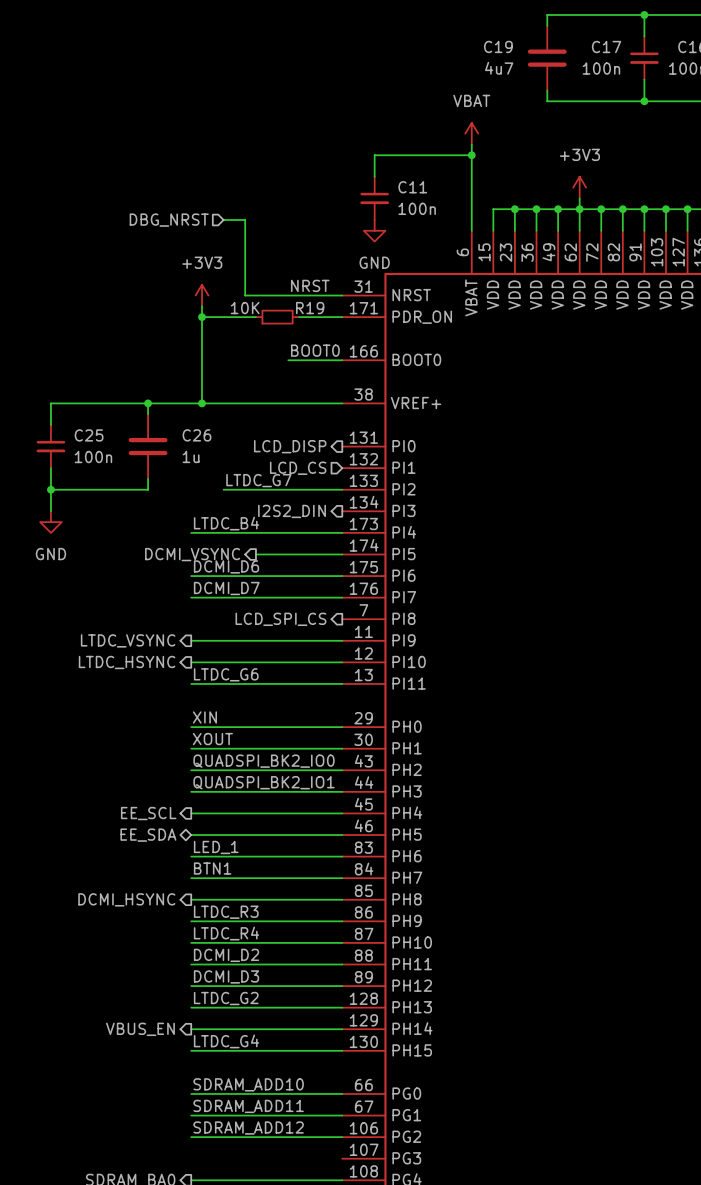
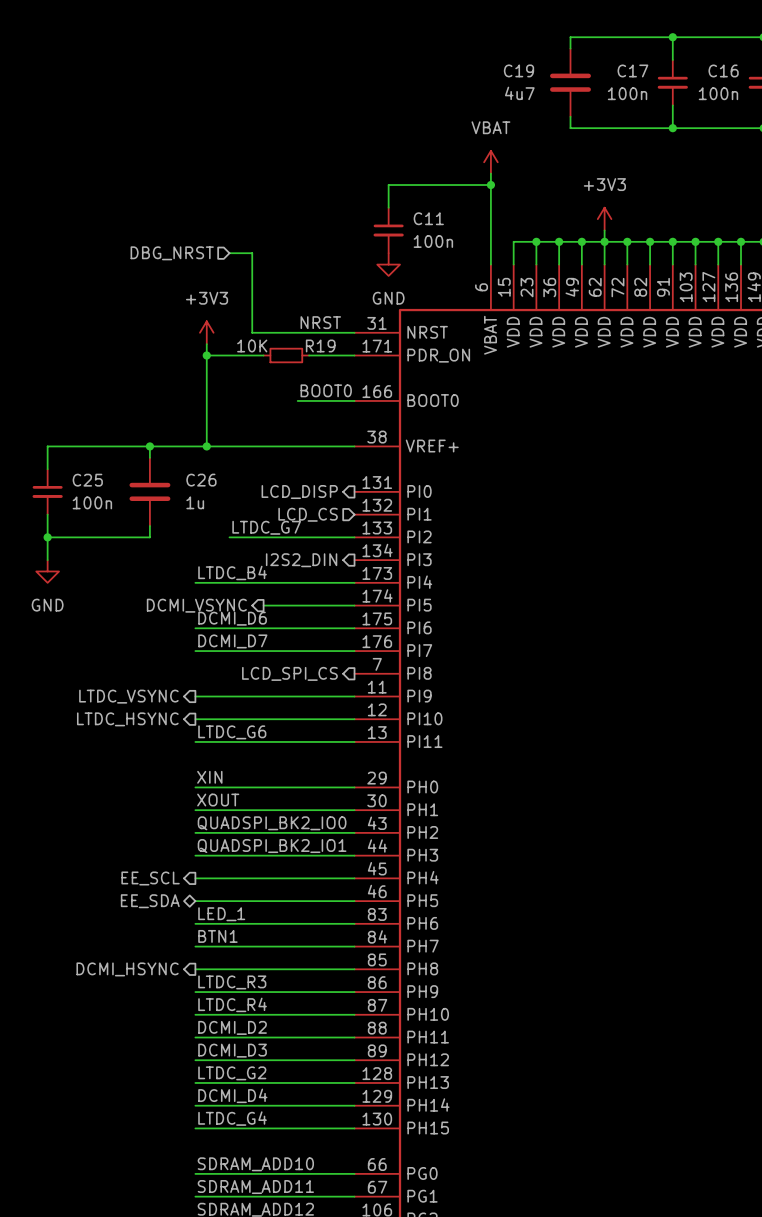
label: none -> DCMI_D4 (232, 1095)
hierarchical label: VBUS_EN (140, 1029) -> none

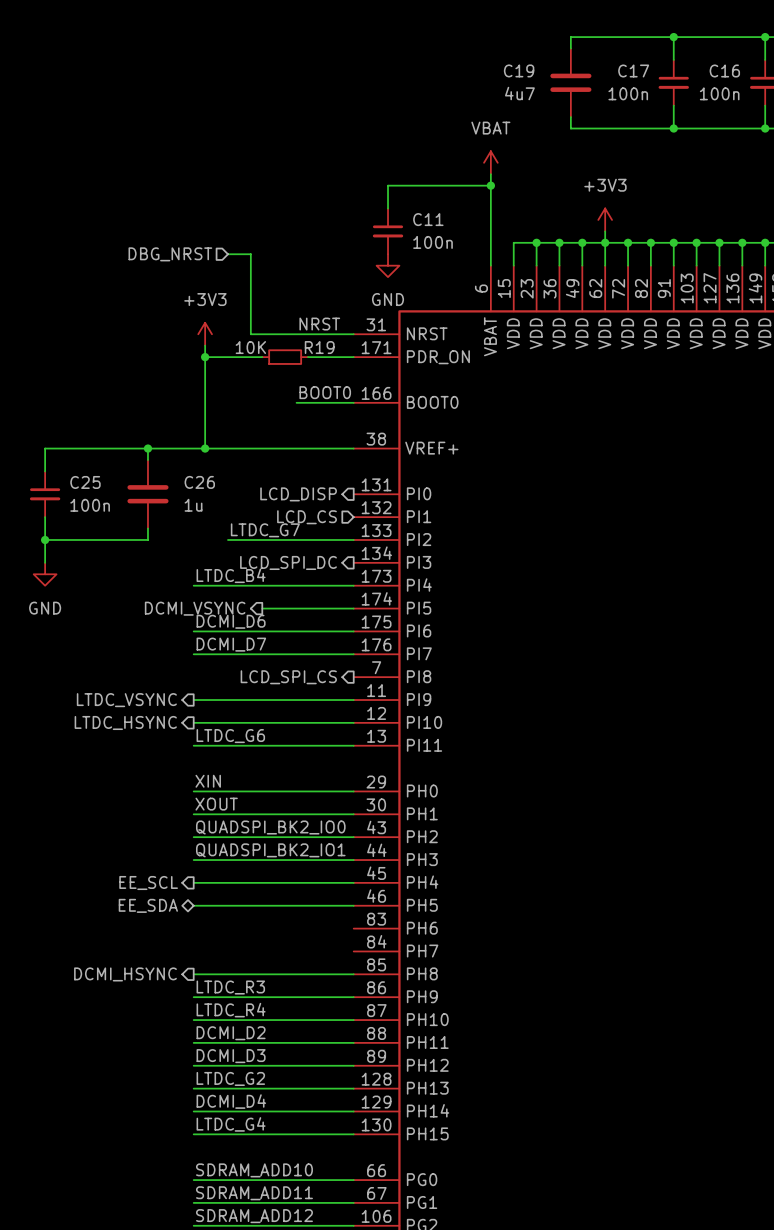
hierarchical label: I2S2_DIN (301, 560) -> LCD_SPI_DC (288, 562)
label: LED_1 (221, 914) -> none
wire: (195, 923) (354, 923) -> none
label: BTN1 (217, 936) -> none
wire: (195, 946) (354, 946) -> none

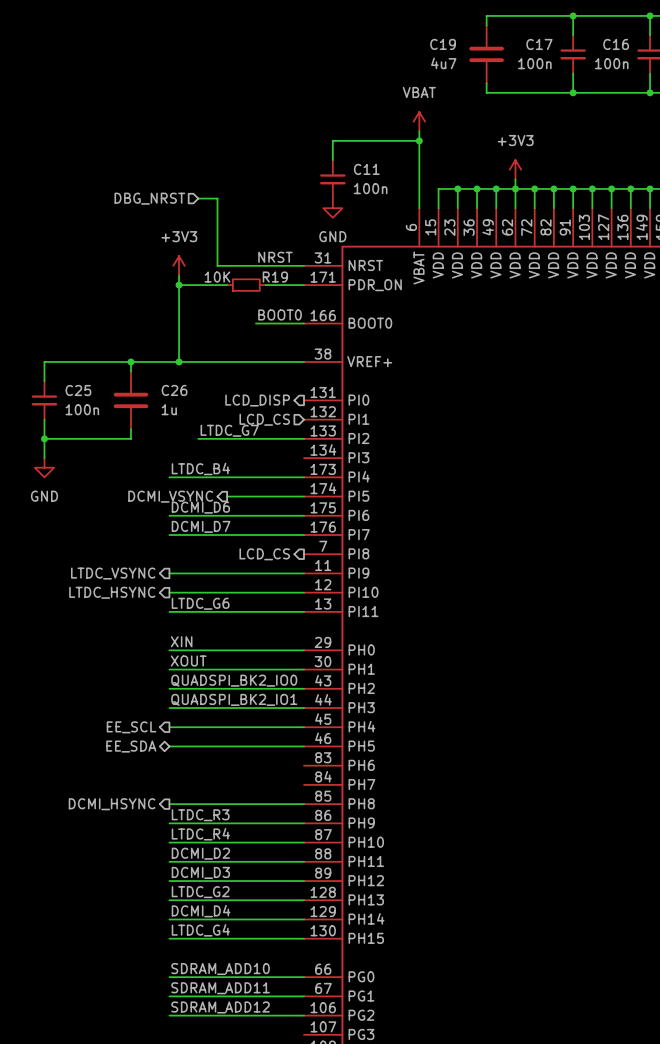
hierarchical label: LCD_SPI_DC (288, 562) -> none
hierarchical label: LCD_SPI_CS (288, 677) -> LCD_CS (264, 554)

